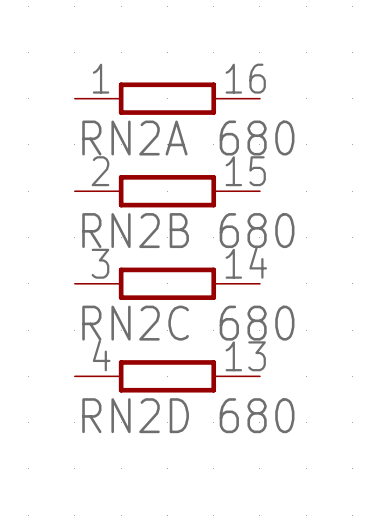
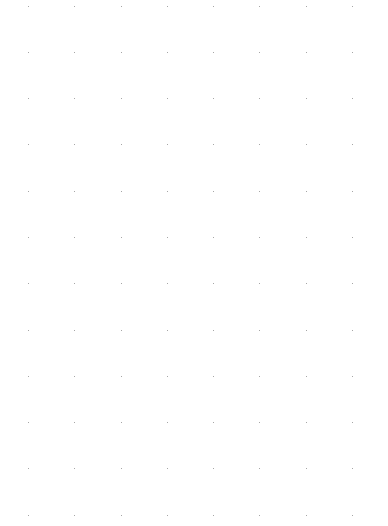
RN2A: 680 (167, 98) -> none
RN2B: 680 (167, 191) -> none
RN2C: 680 (167, 283) -> none
RN2D: 680 (167, 376) -> none

